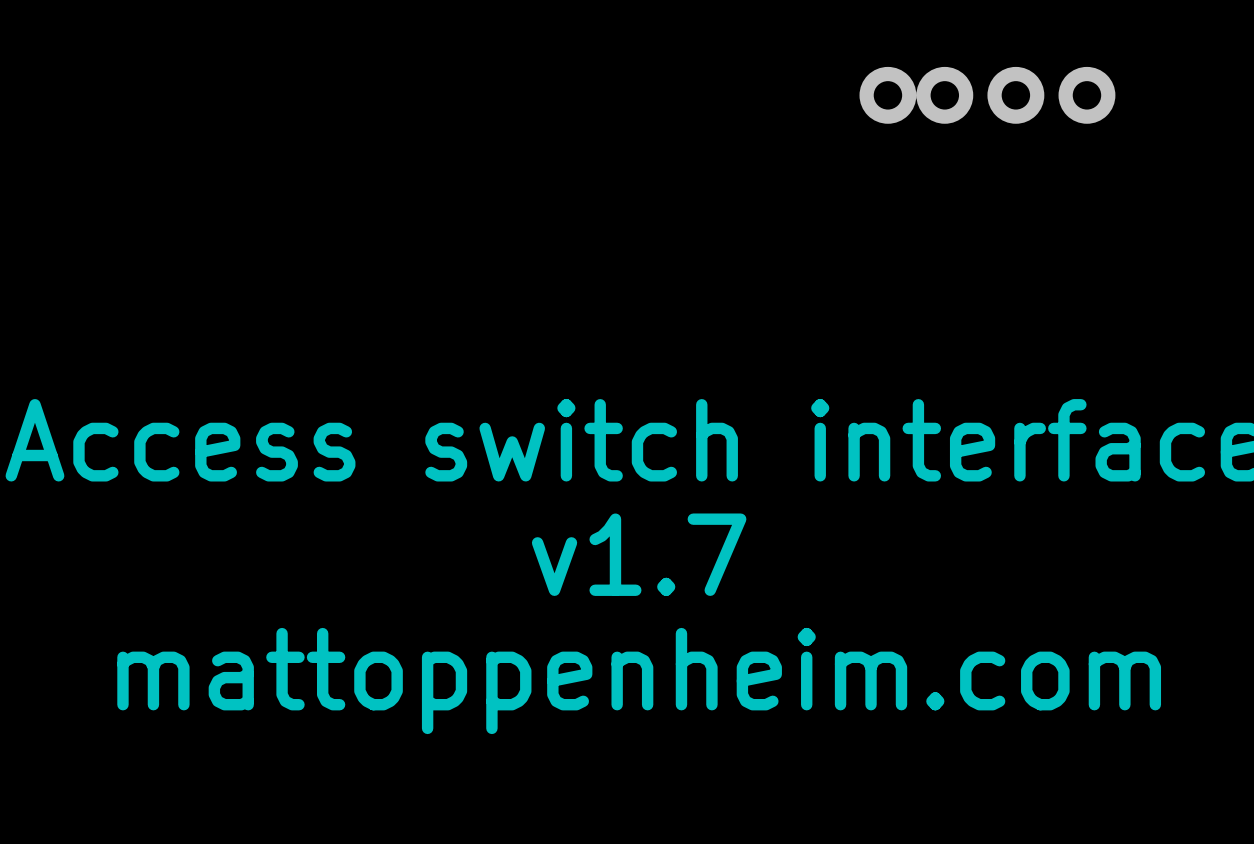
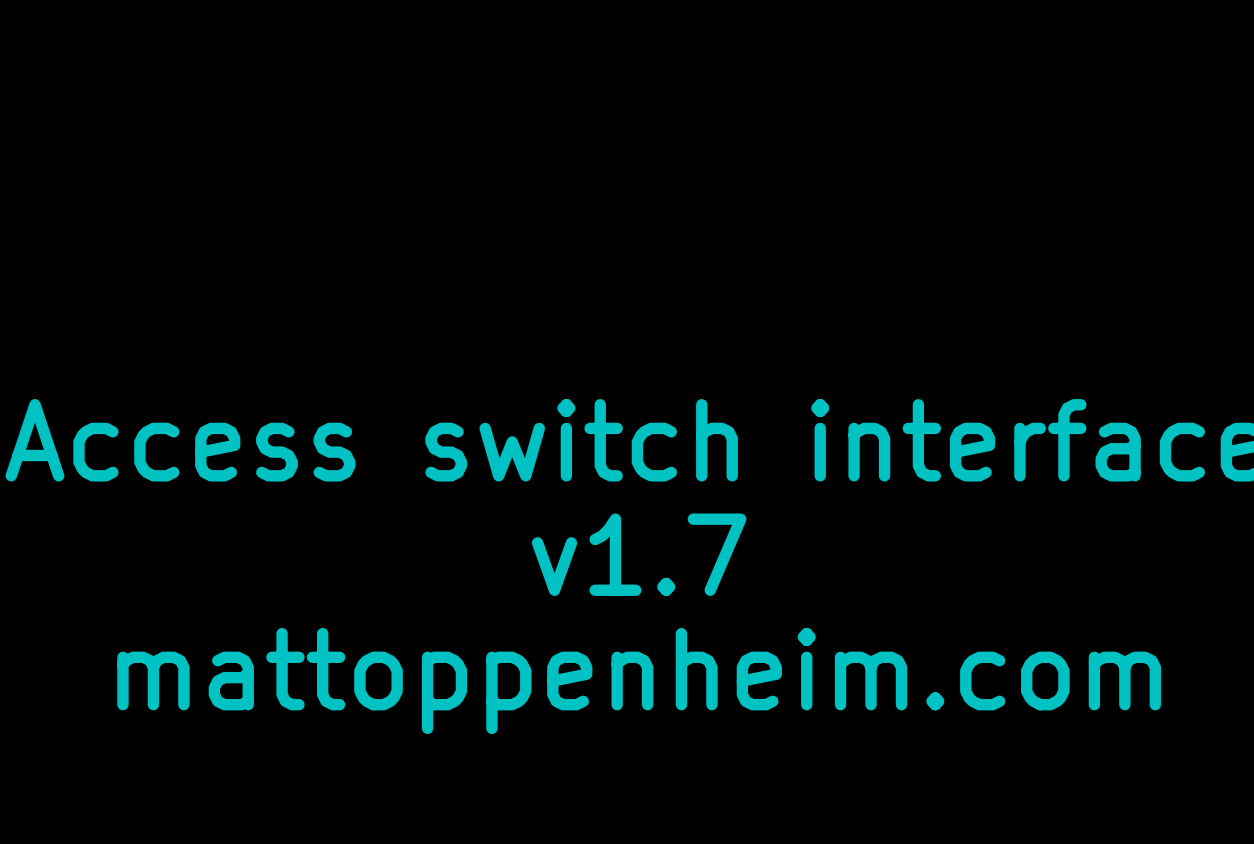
via: (887, 95) -> none
via: (944, 95) -> none
via: (1015, 95) -> none
via: (1086, 95) -> none

